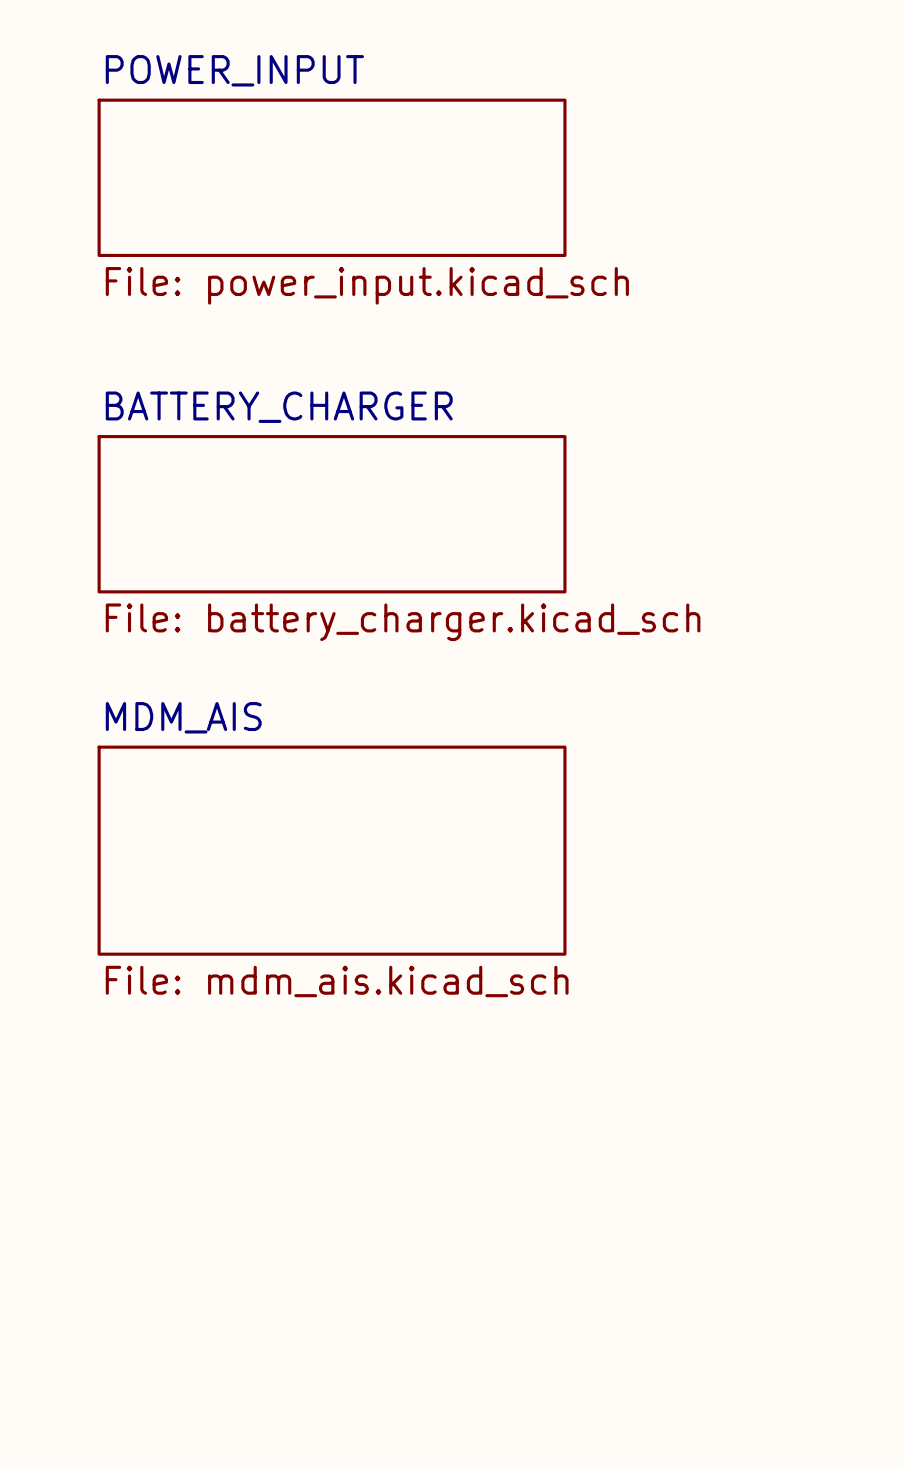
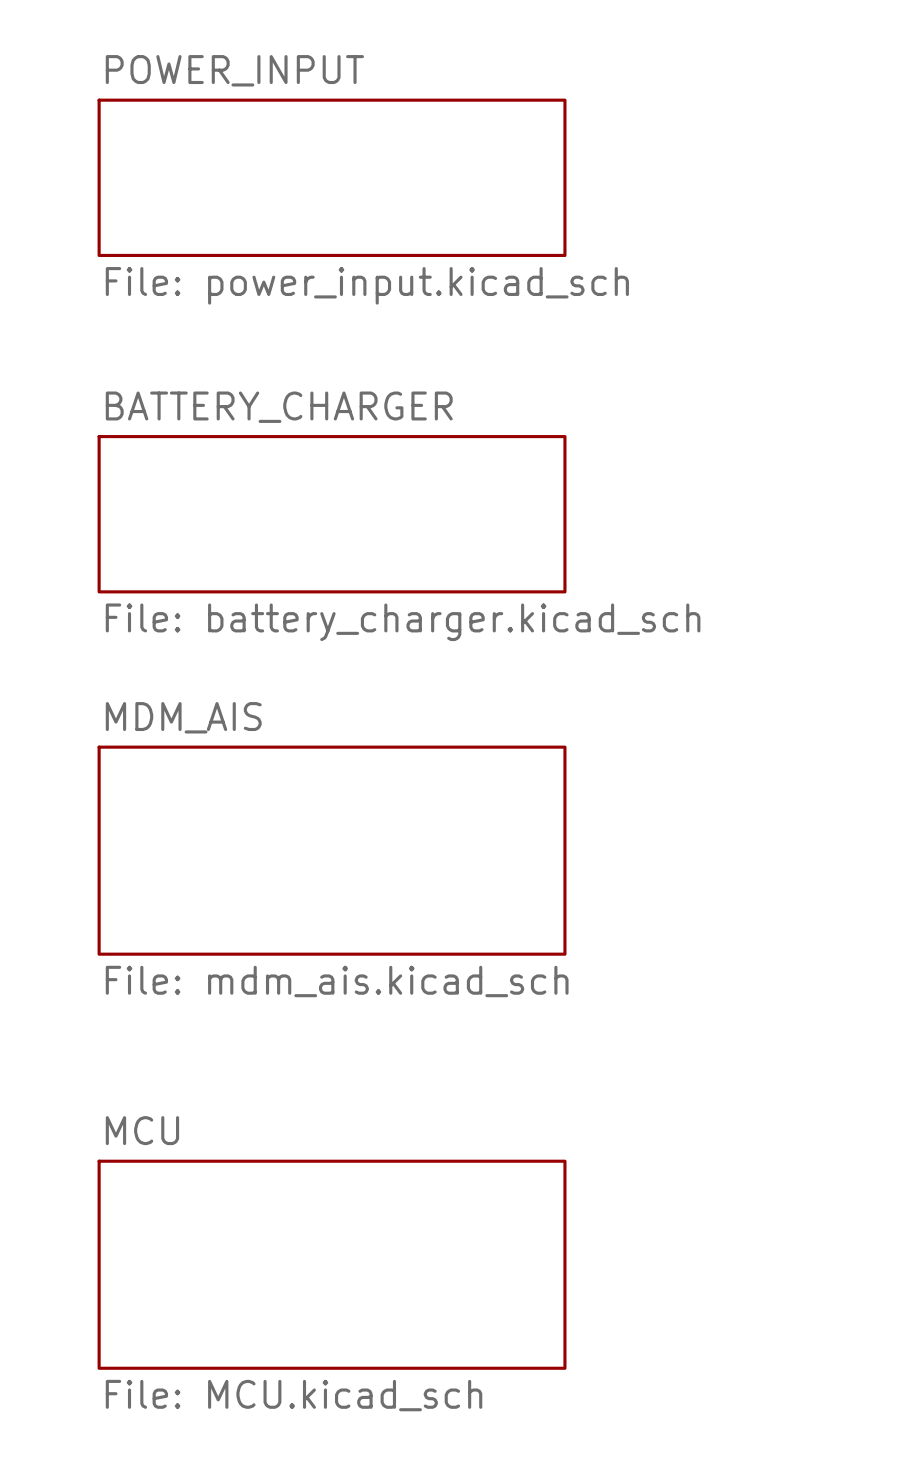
sheet MCU: none -> File: MCU.kicad_sch (332, 1264)

